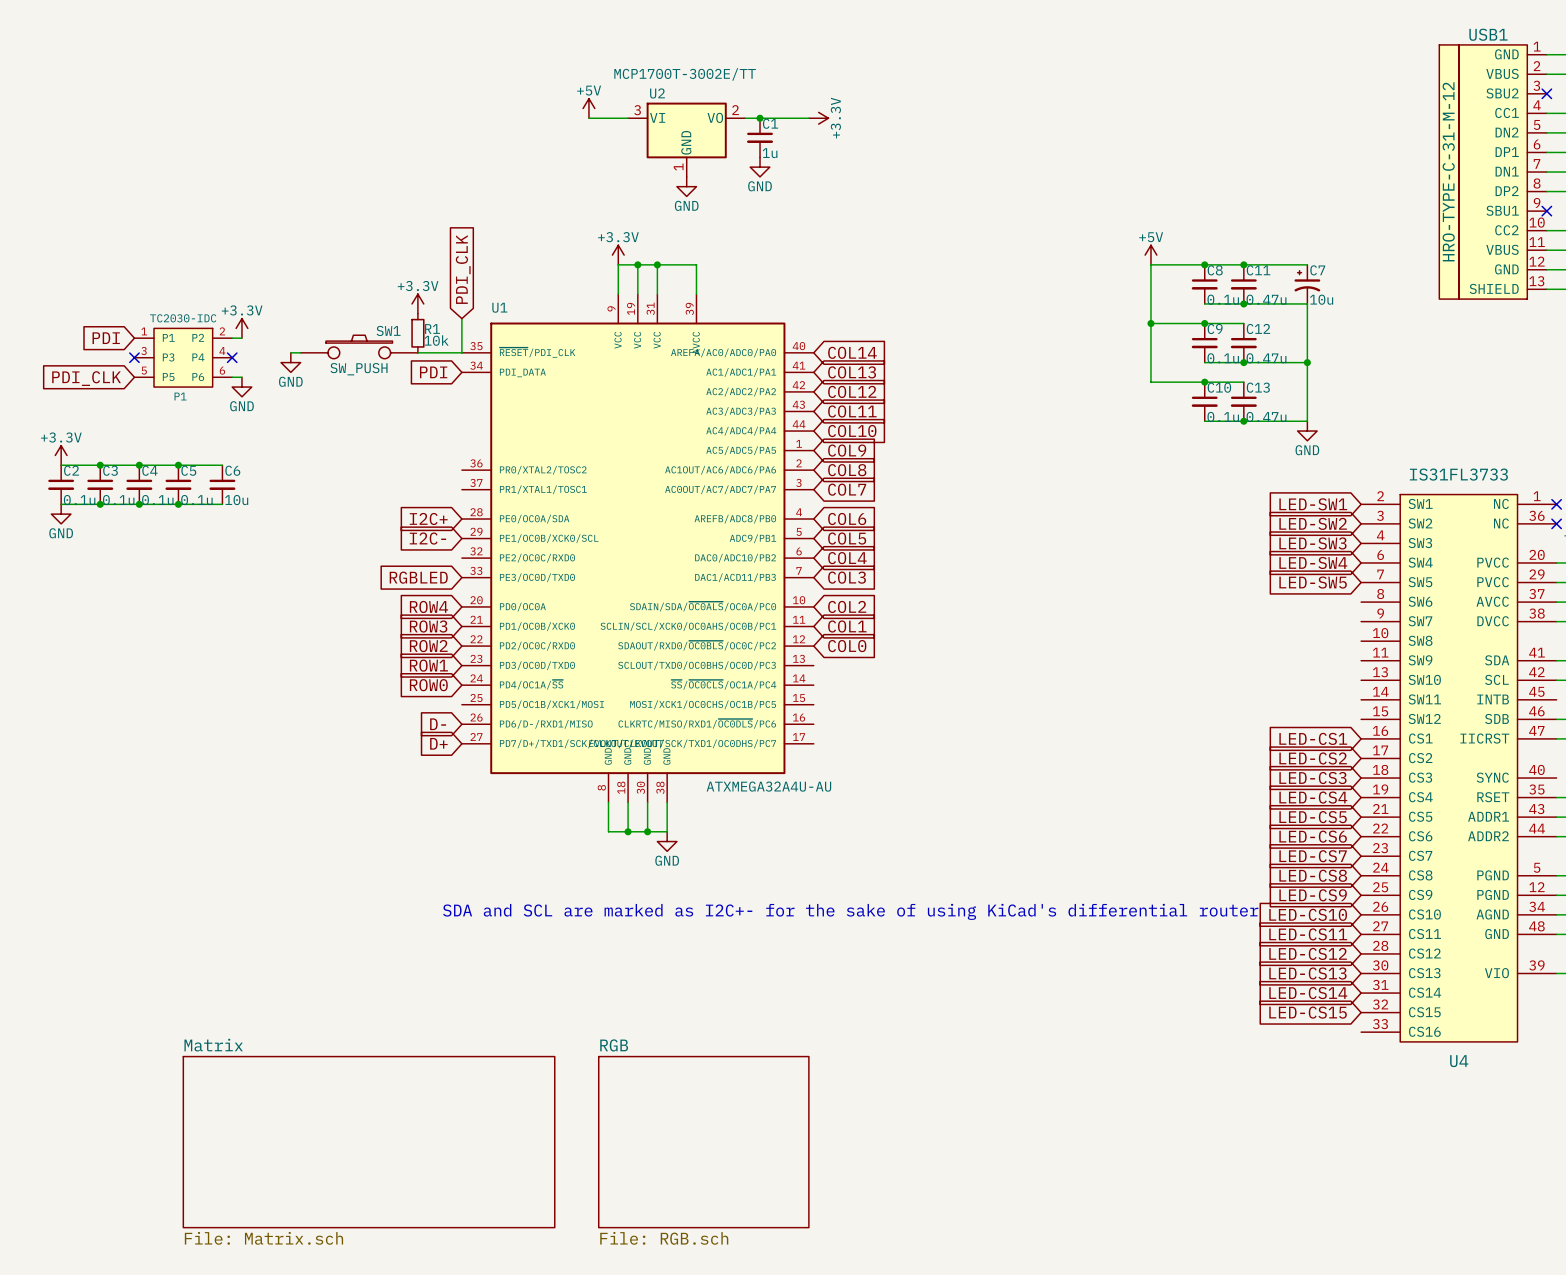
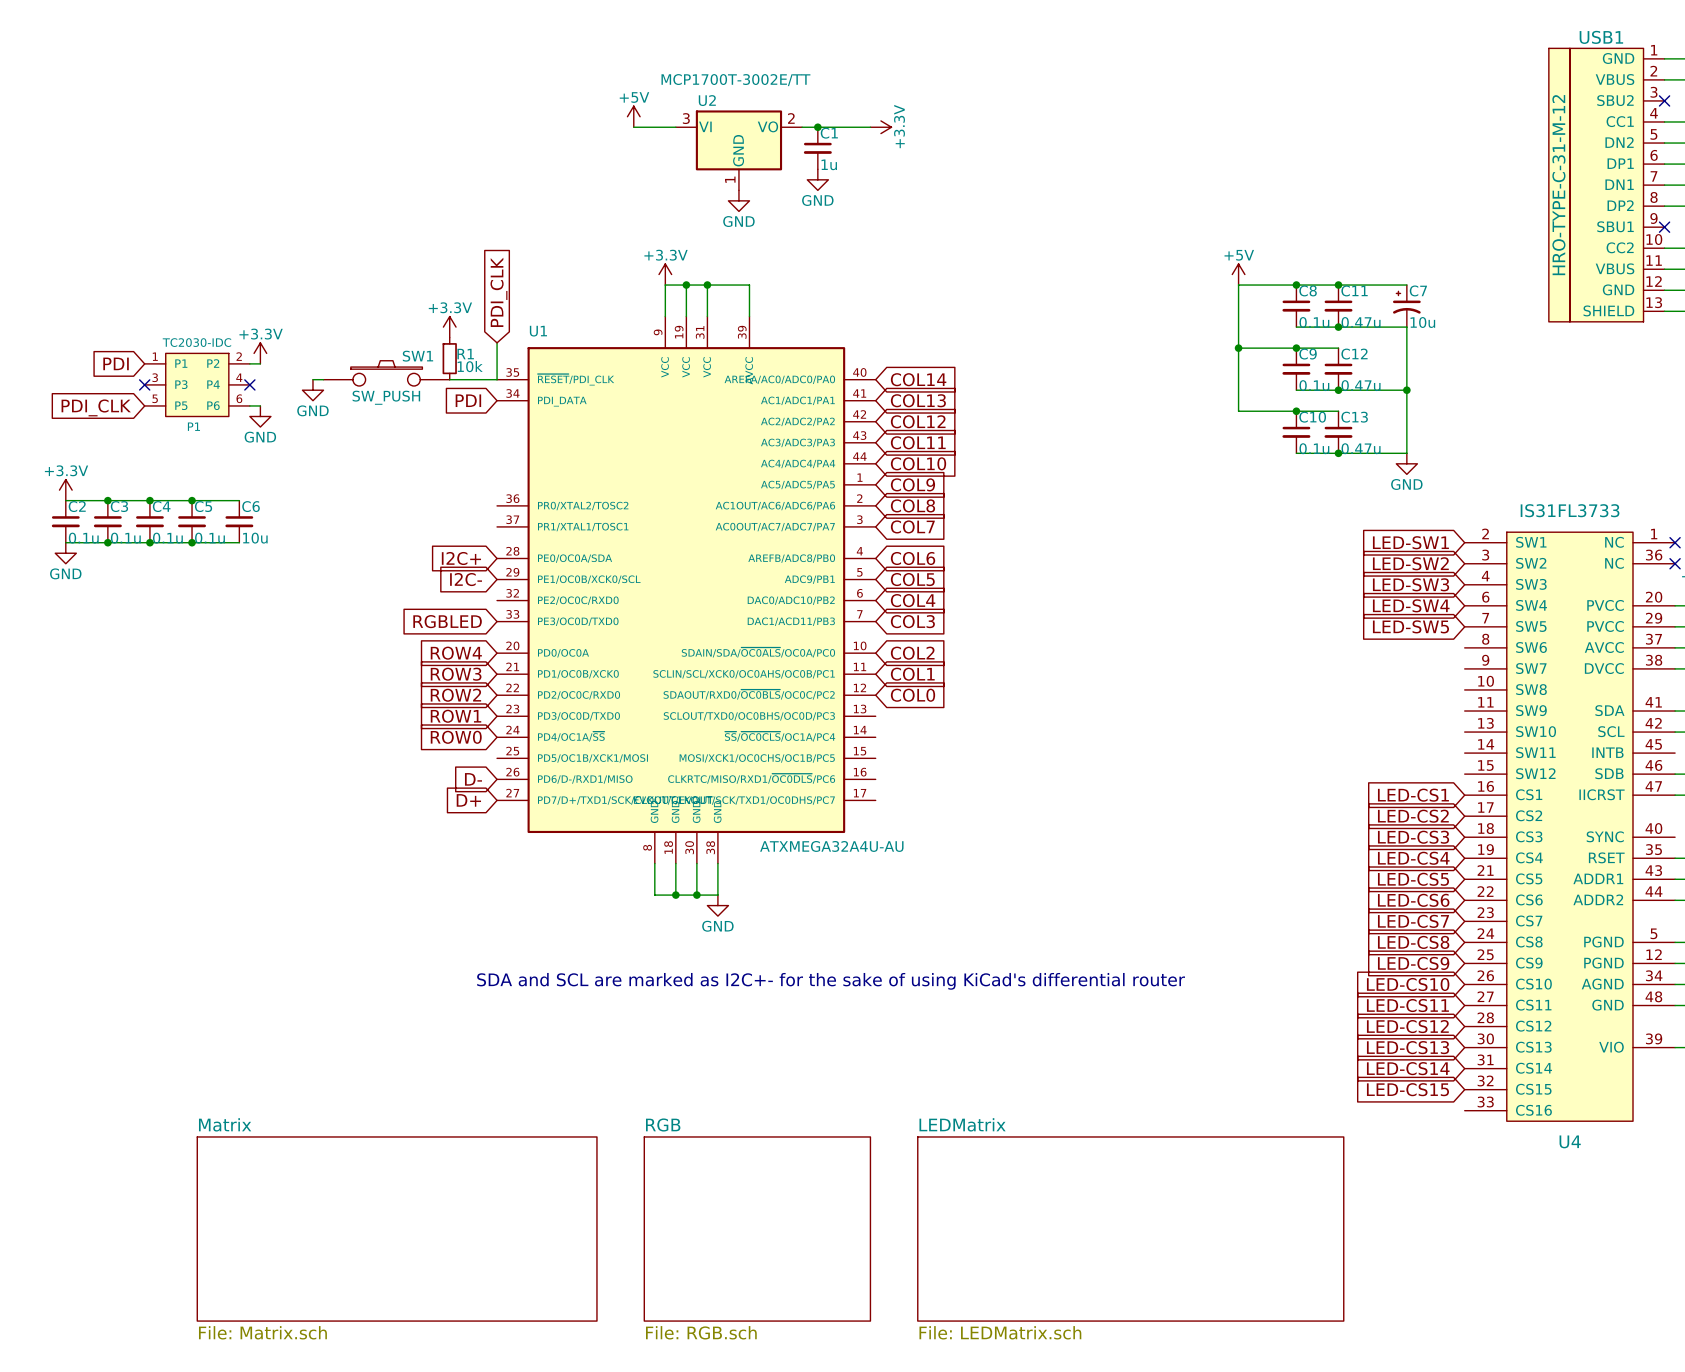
sheet LEDMatrix: none -> File: LEDMatrix.sch (1130, 1229)

